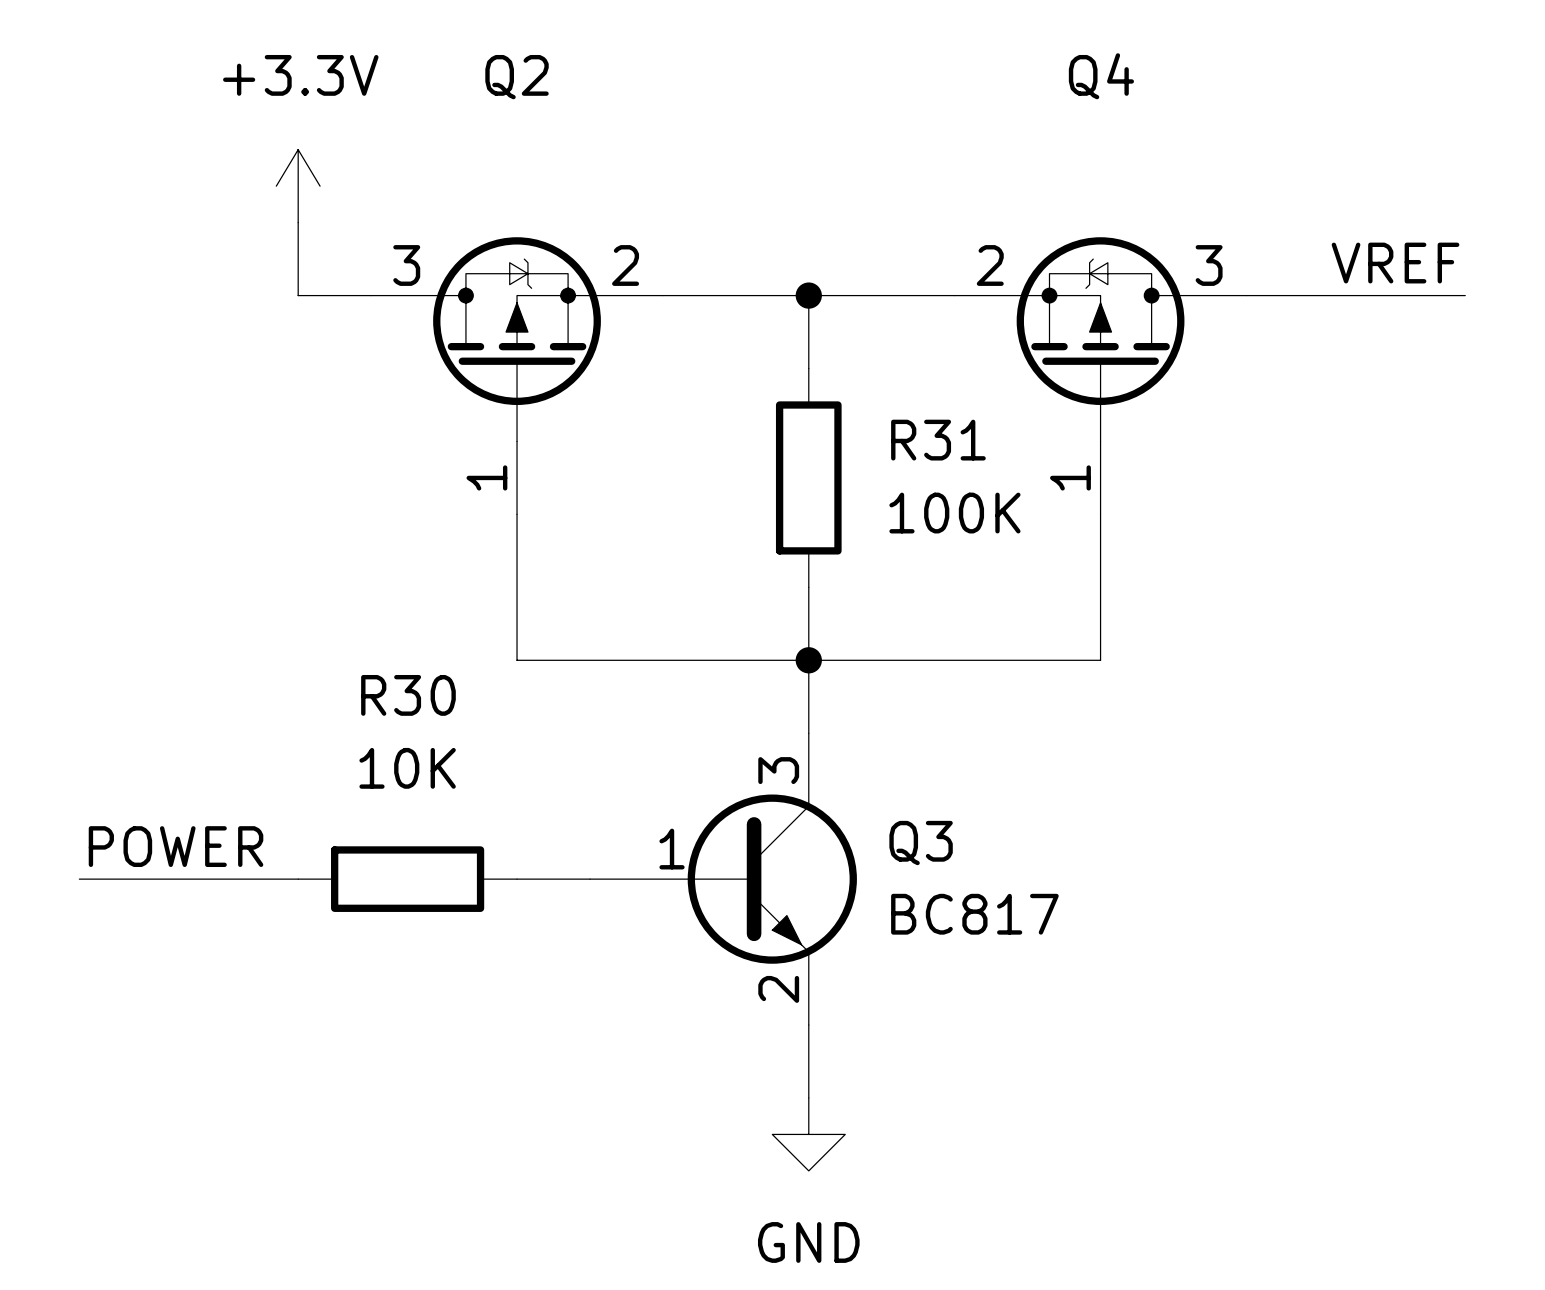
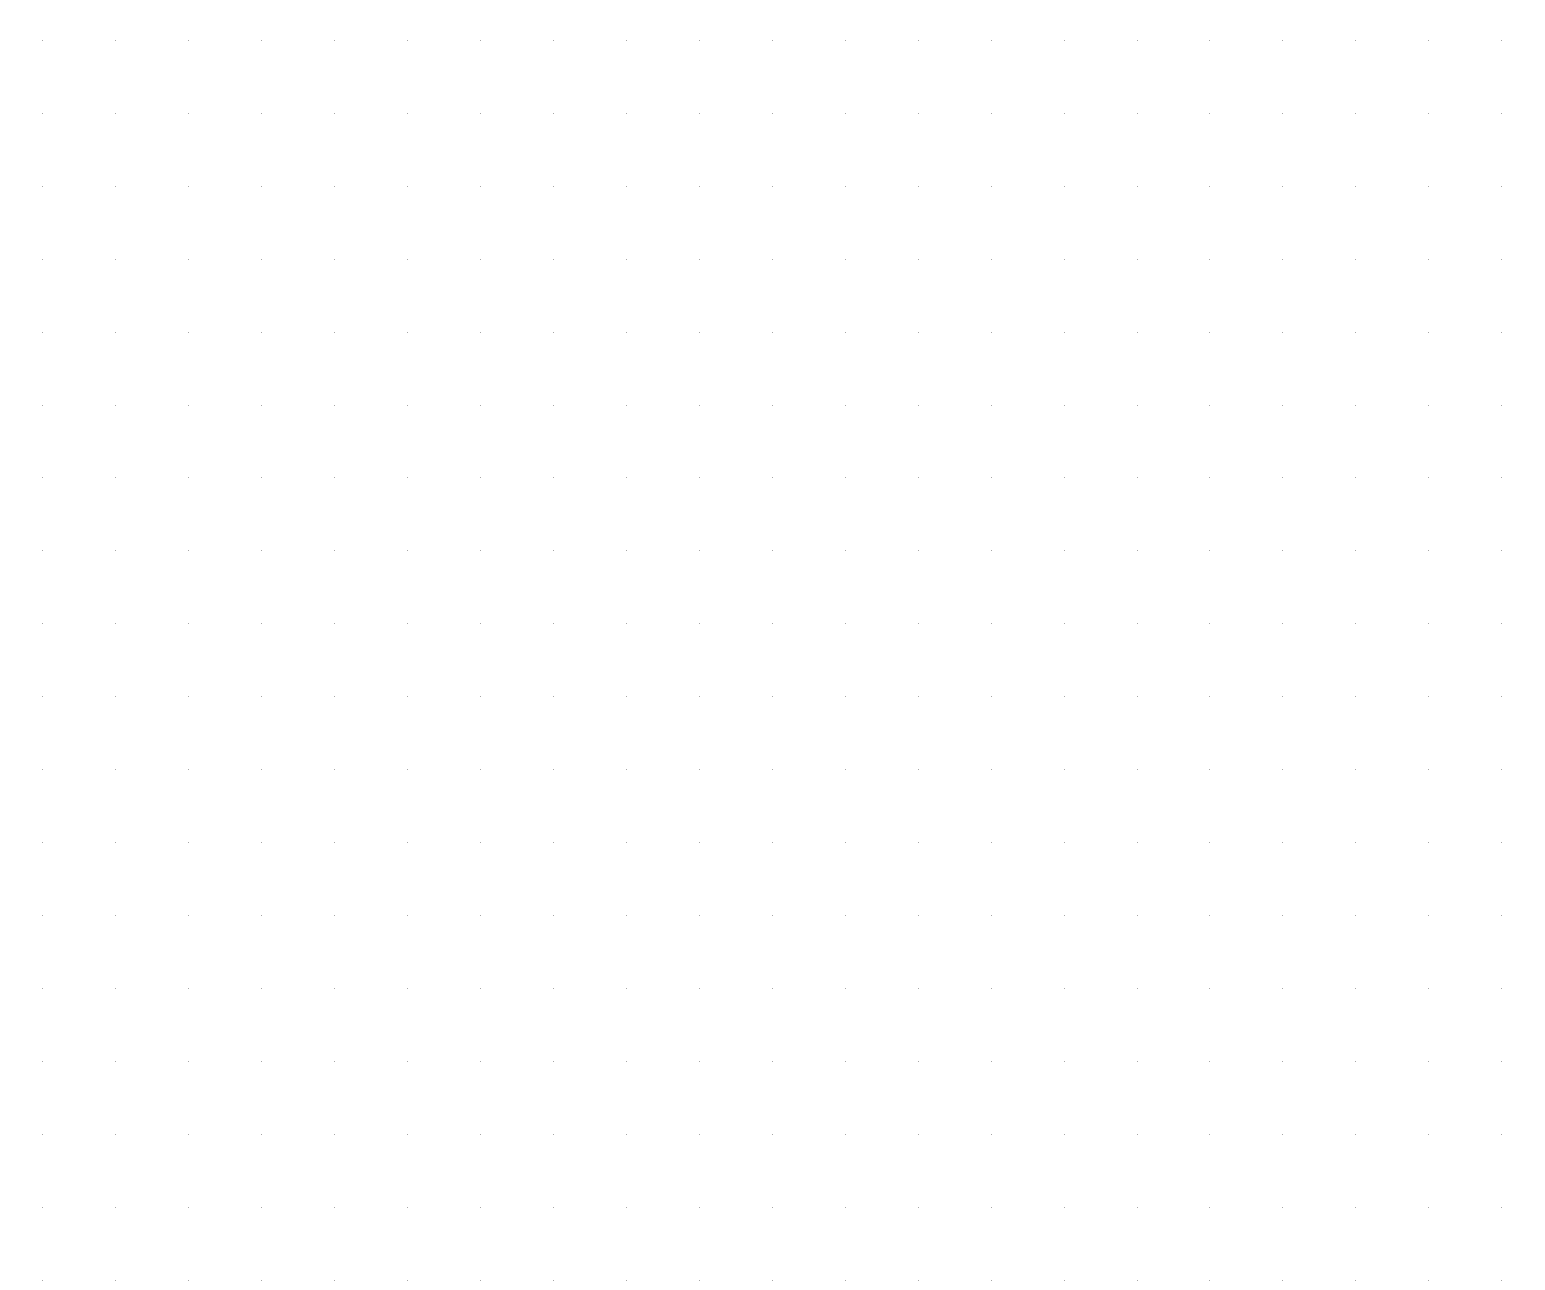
power symbol: +3.3V (298, 186) -> none
wire: (298, 222) (298, 295) (371, 295) -> none
label: VREF (1395, 263) -> none
wire: (662, 295) (954, 295) -> none
wire: (808, 295) (808, 368) -> none
junction: (808, 295) -> none
wire: (1246, 295) (1465, 295) -> none
Q2: (517, 375) -> none
Q4: (1100, 375) -> none
R31: 100K (808, 477) -> none
wire: (517, 514) (517, 660) (1100, 660) (1100, 514) -> none
wire: (808, 587) (808, 733) -> none
junction: (808, 660) -> none
label: POWER (176, 846) -> none
wire: (79, 879) (298, 879) -> none
R30: 10K (407, 879) -> none
wire: (517, 879) (589, 879) -> none
Q3: BC817 (723, 879) -> none
wire: (808, 1025) (808, 1097) -> none
power symbol: GND (808, 1134) -> none

